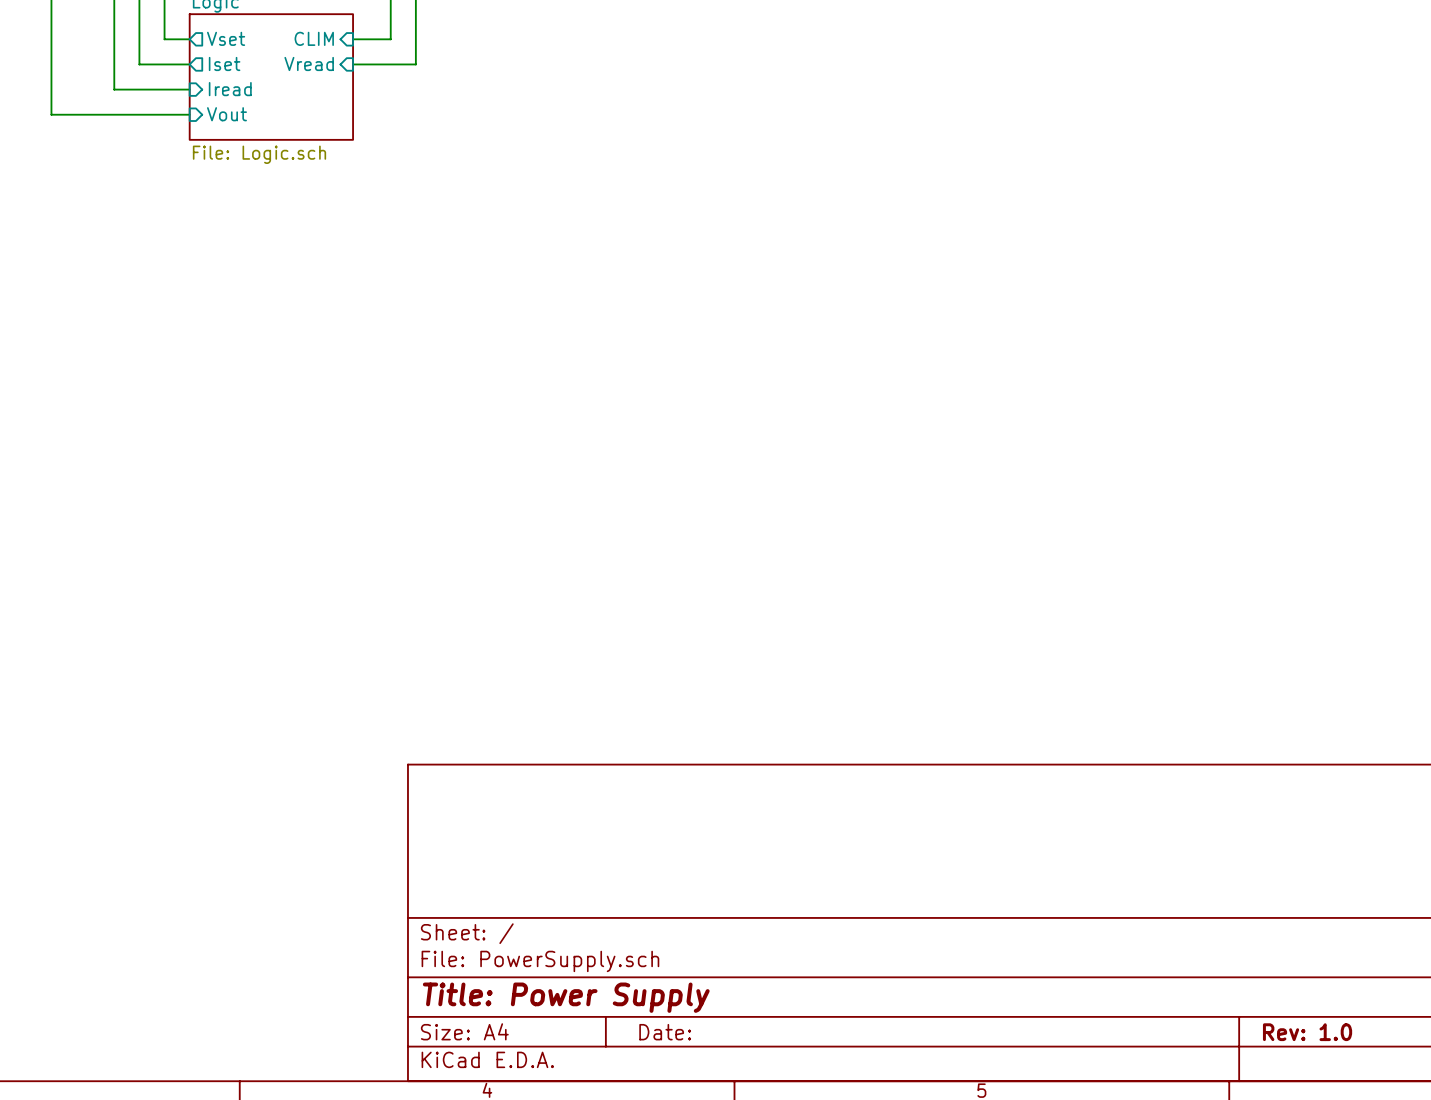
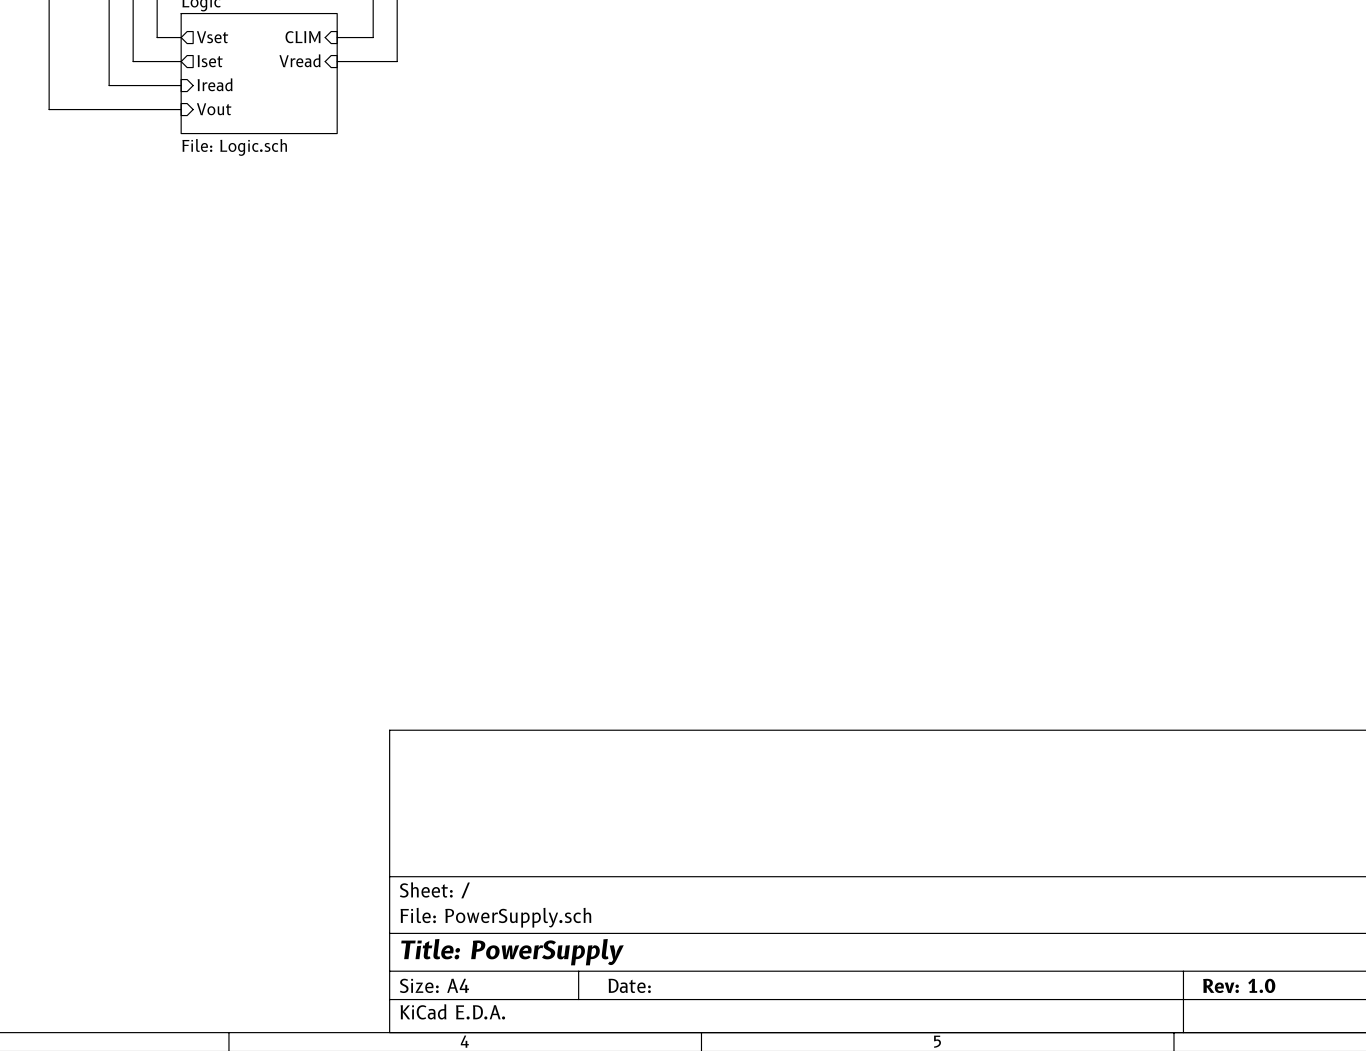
title block: Title: Power Supply (566, 997) -> Title: PowerSupply (512, 952)

